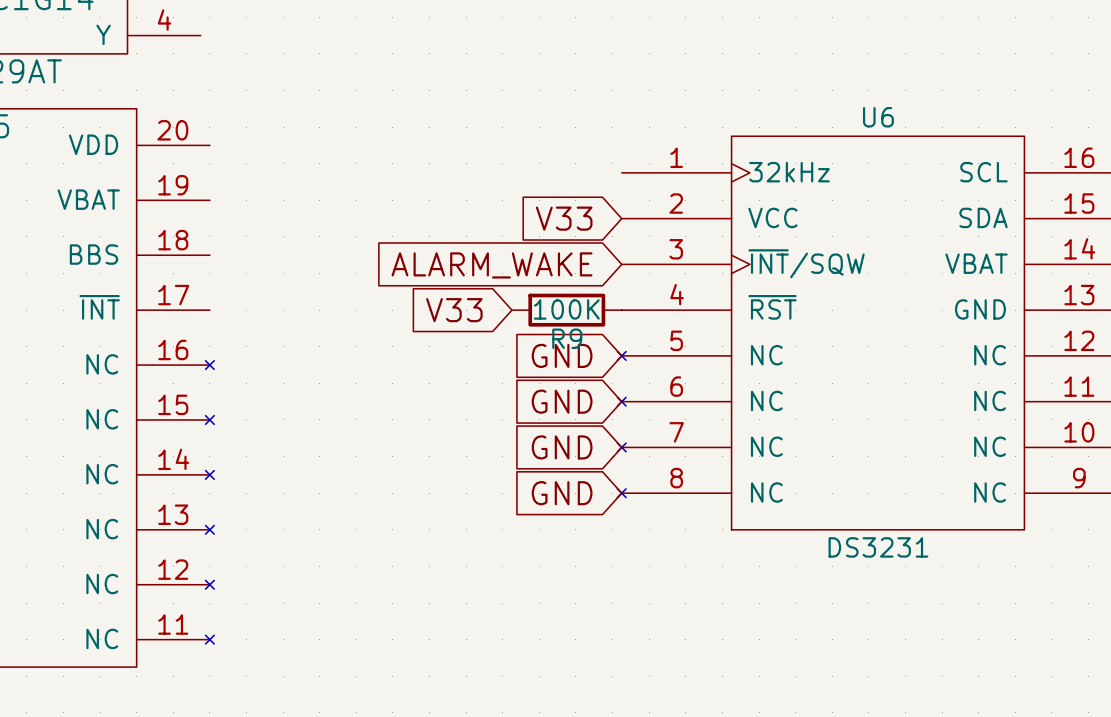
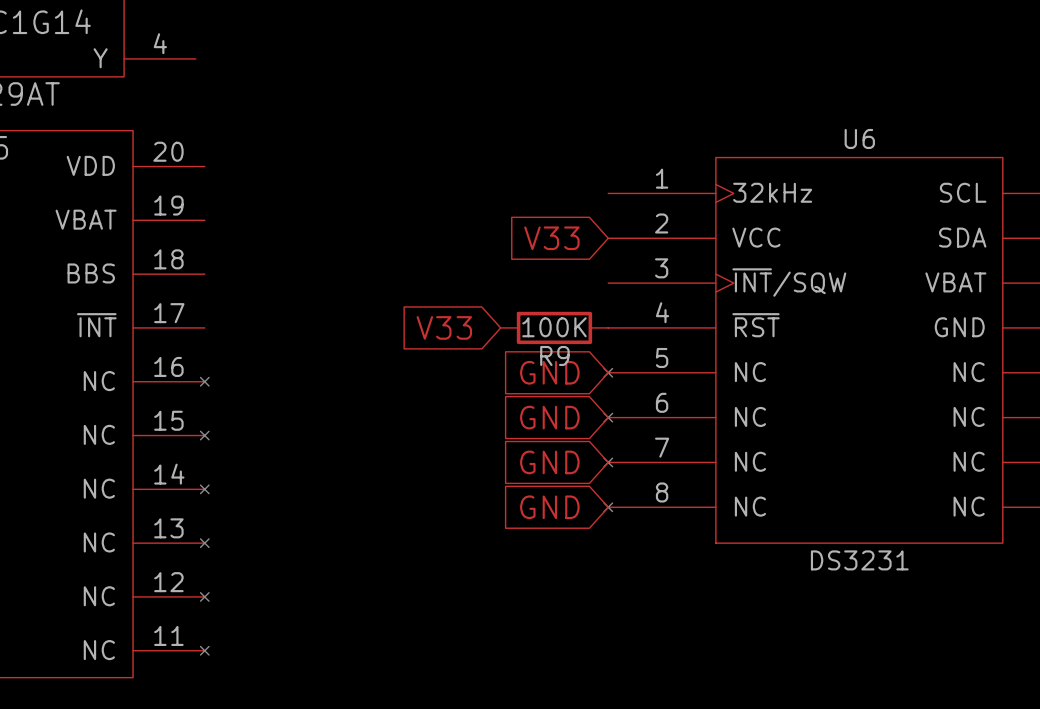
global label: ALARM_WAKE (492, 265) -> none

